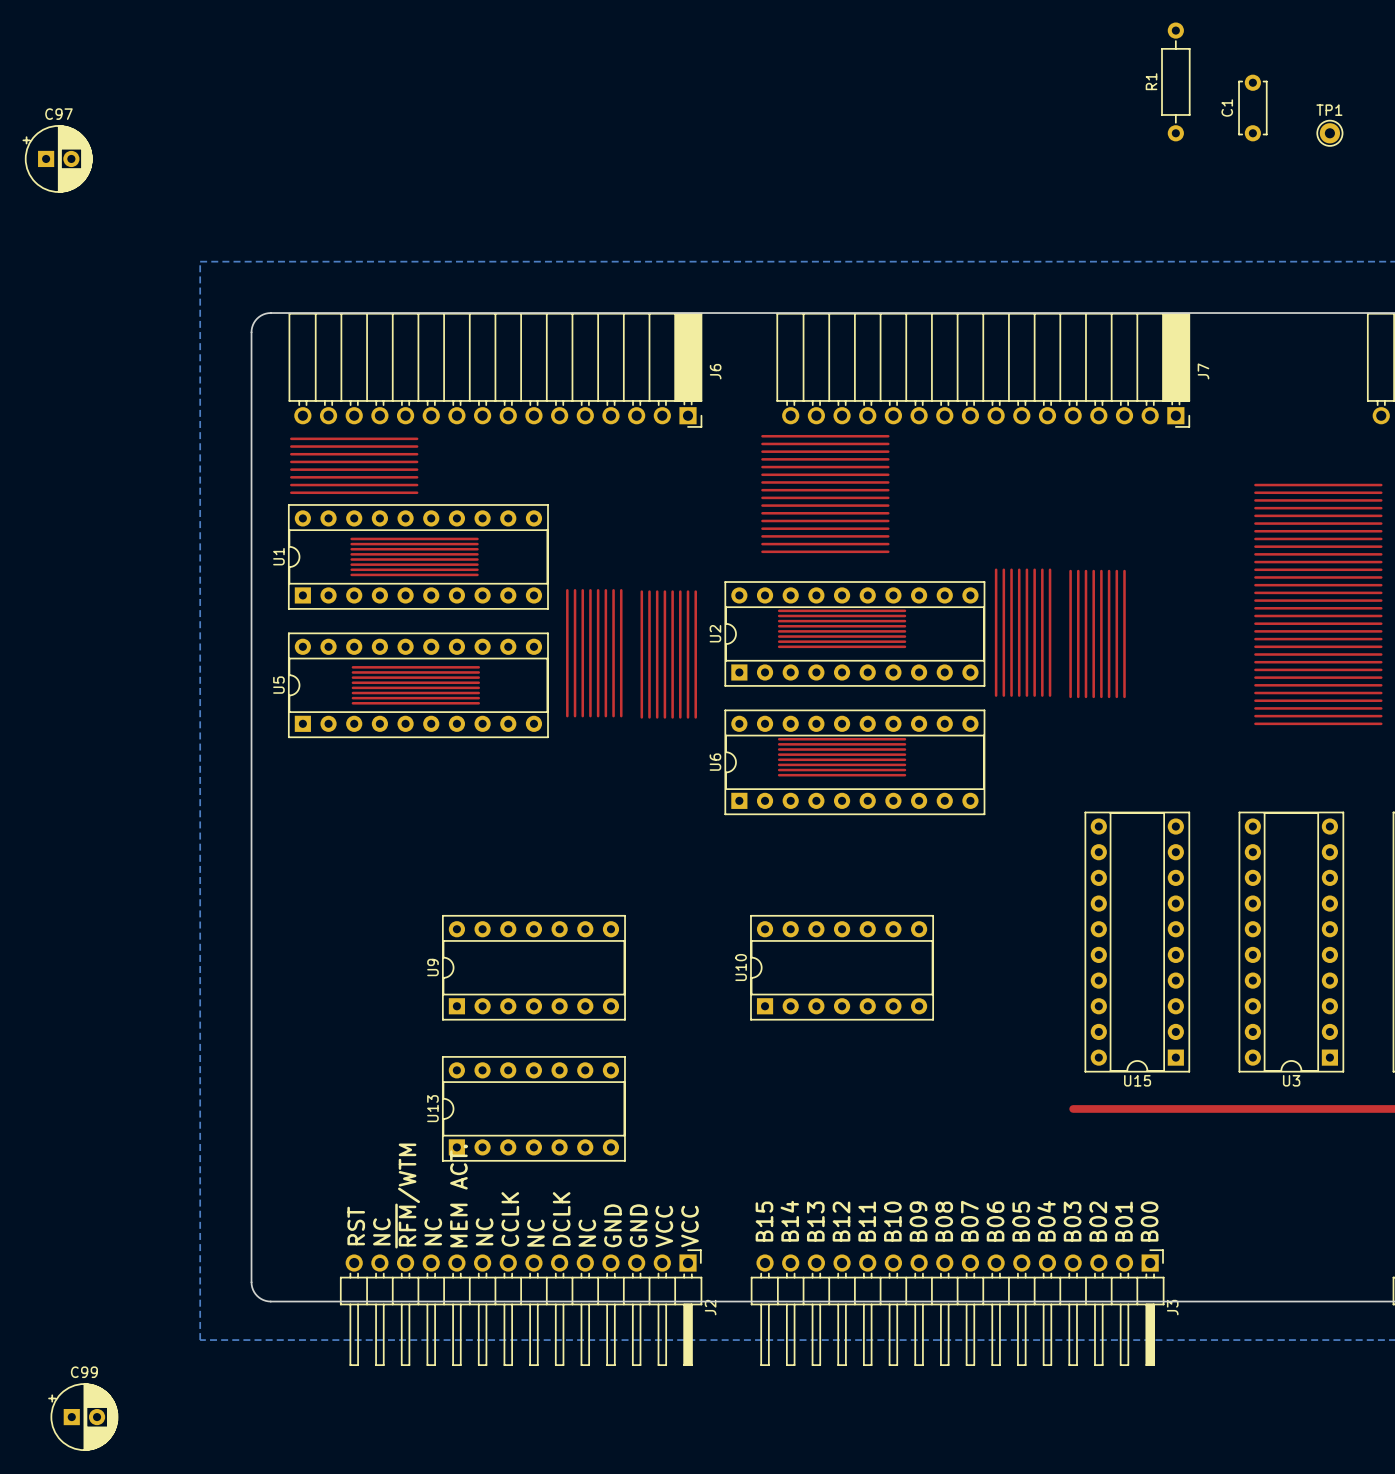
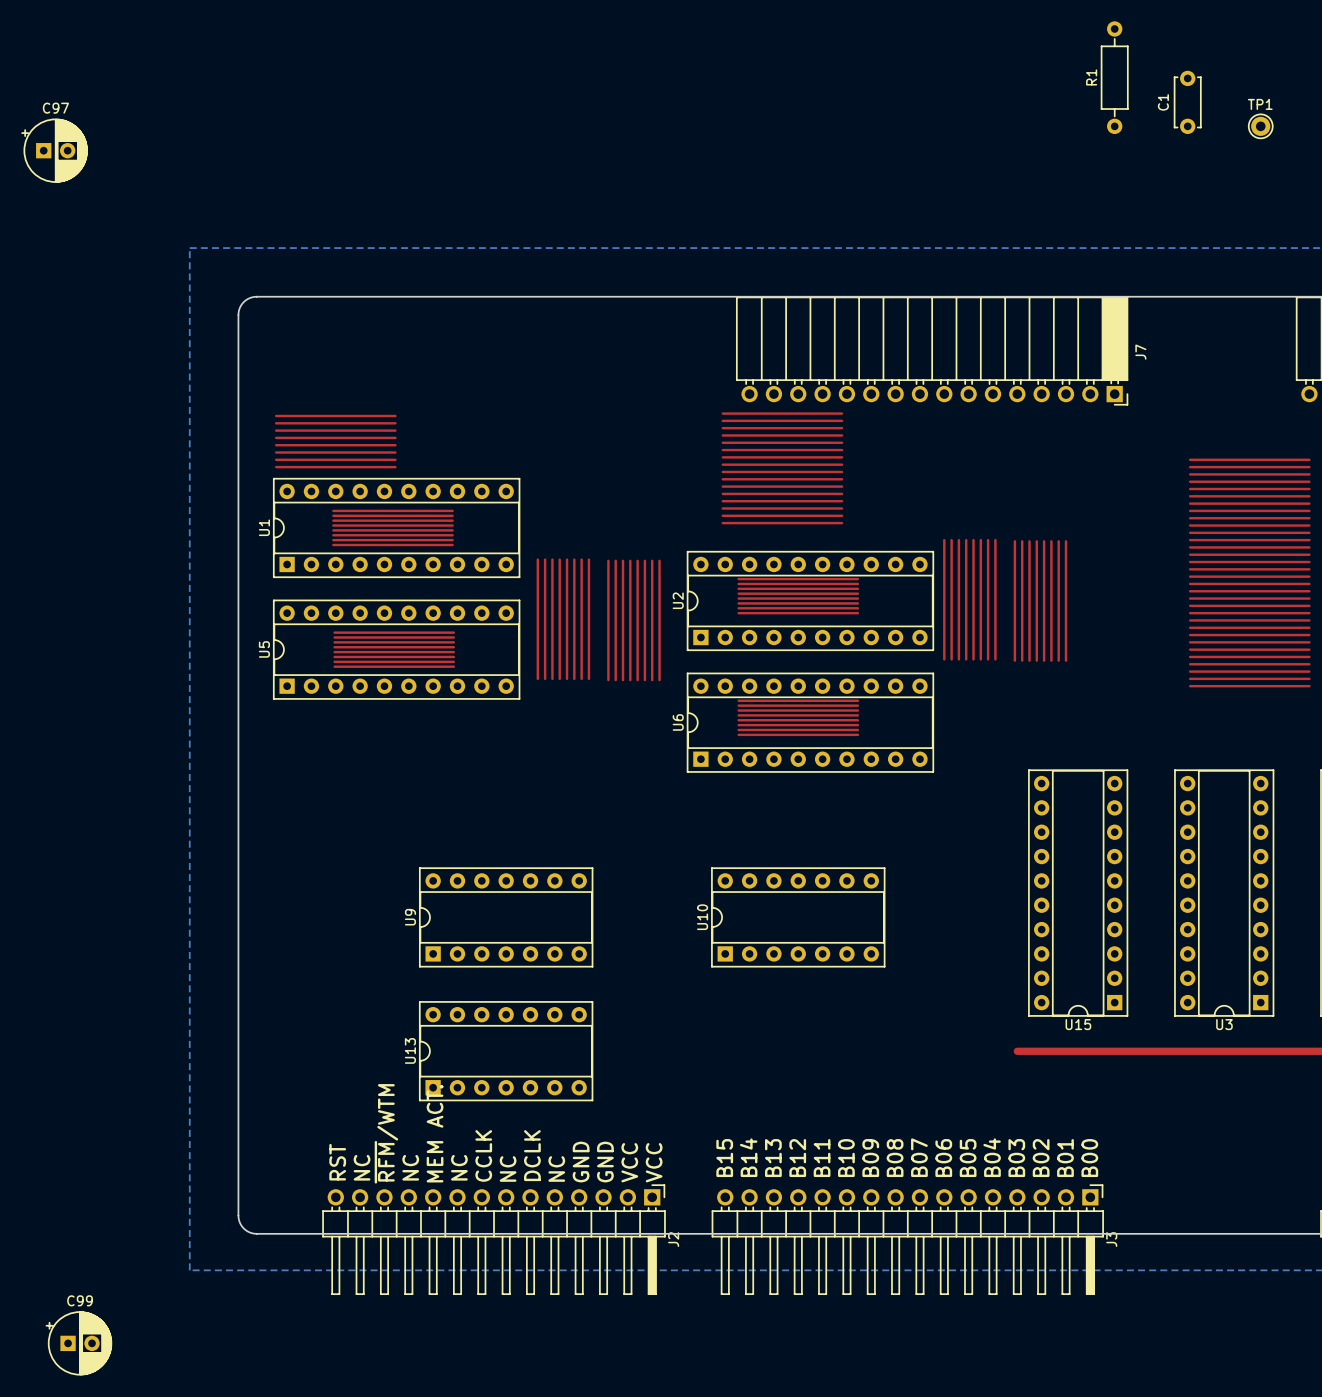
J6: (495, 370) -> none

